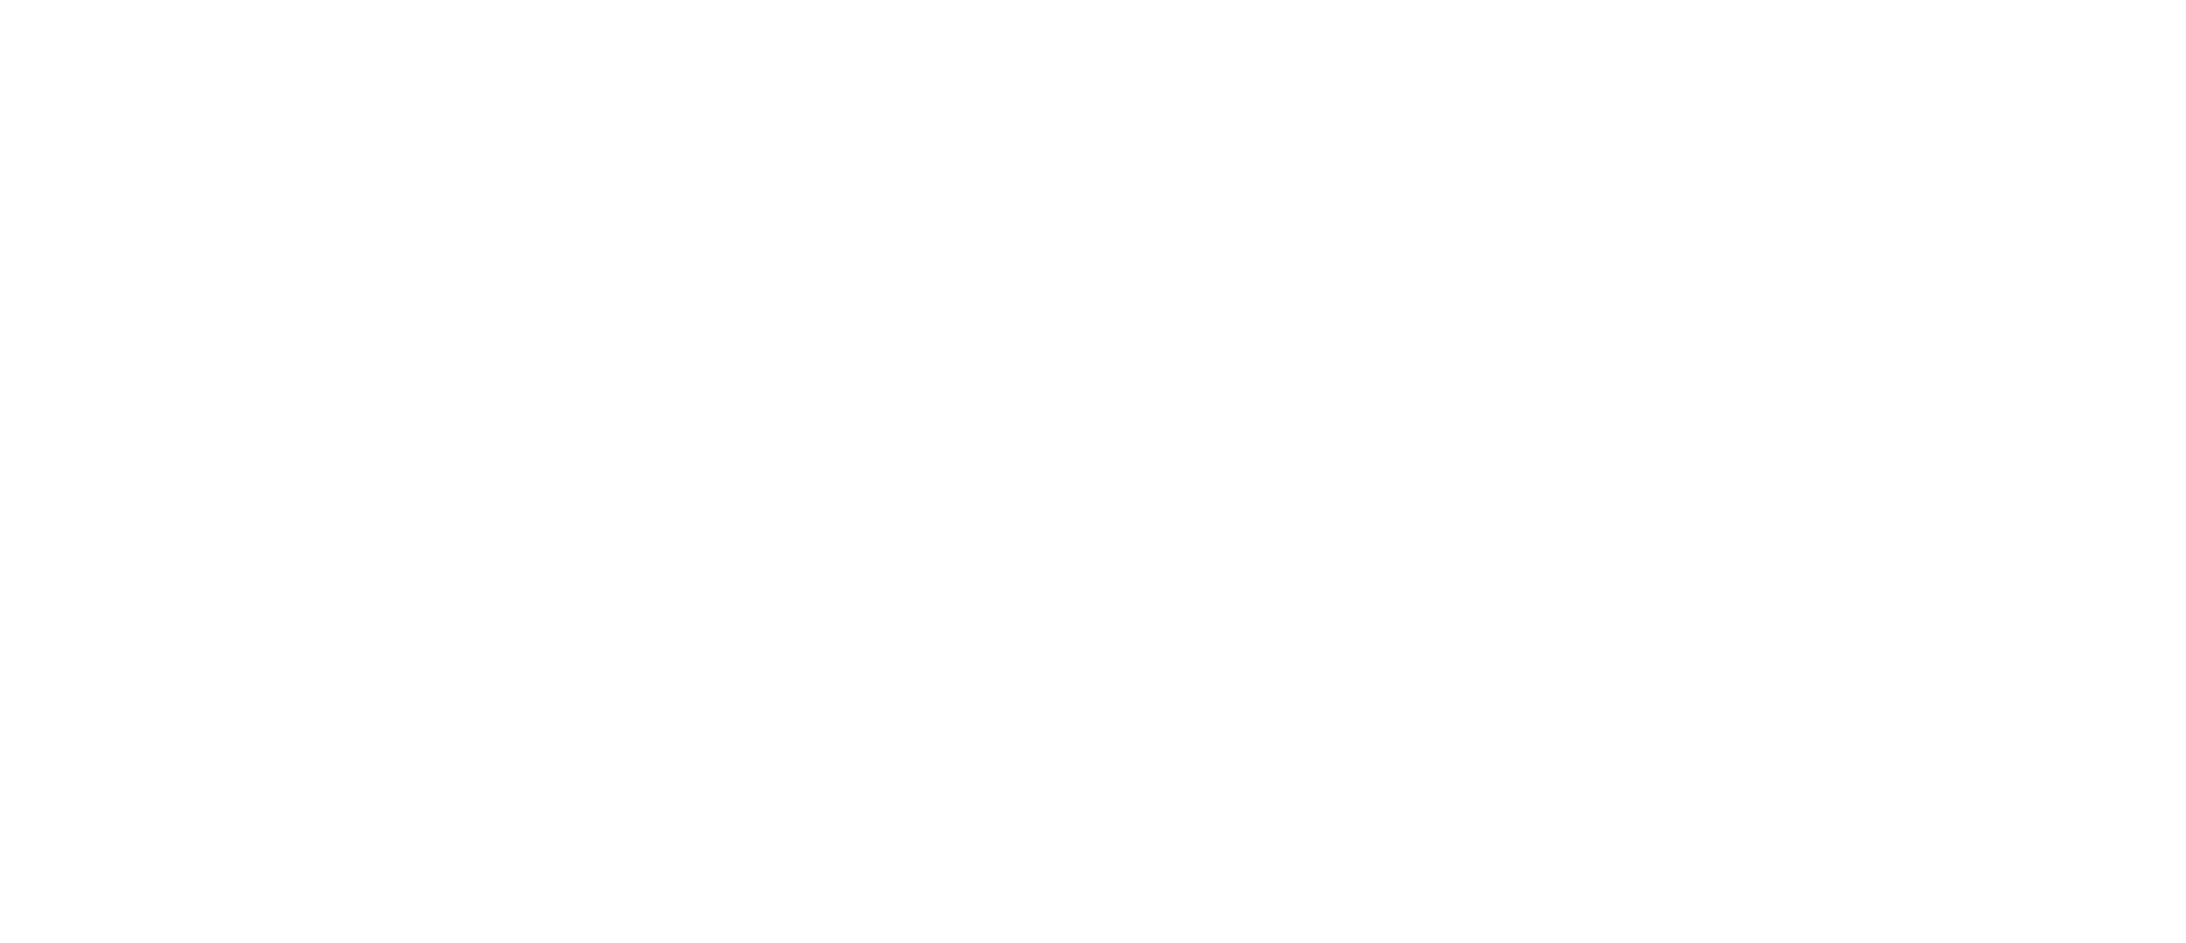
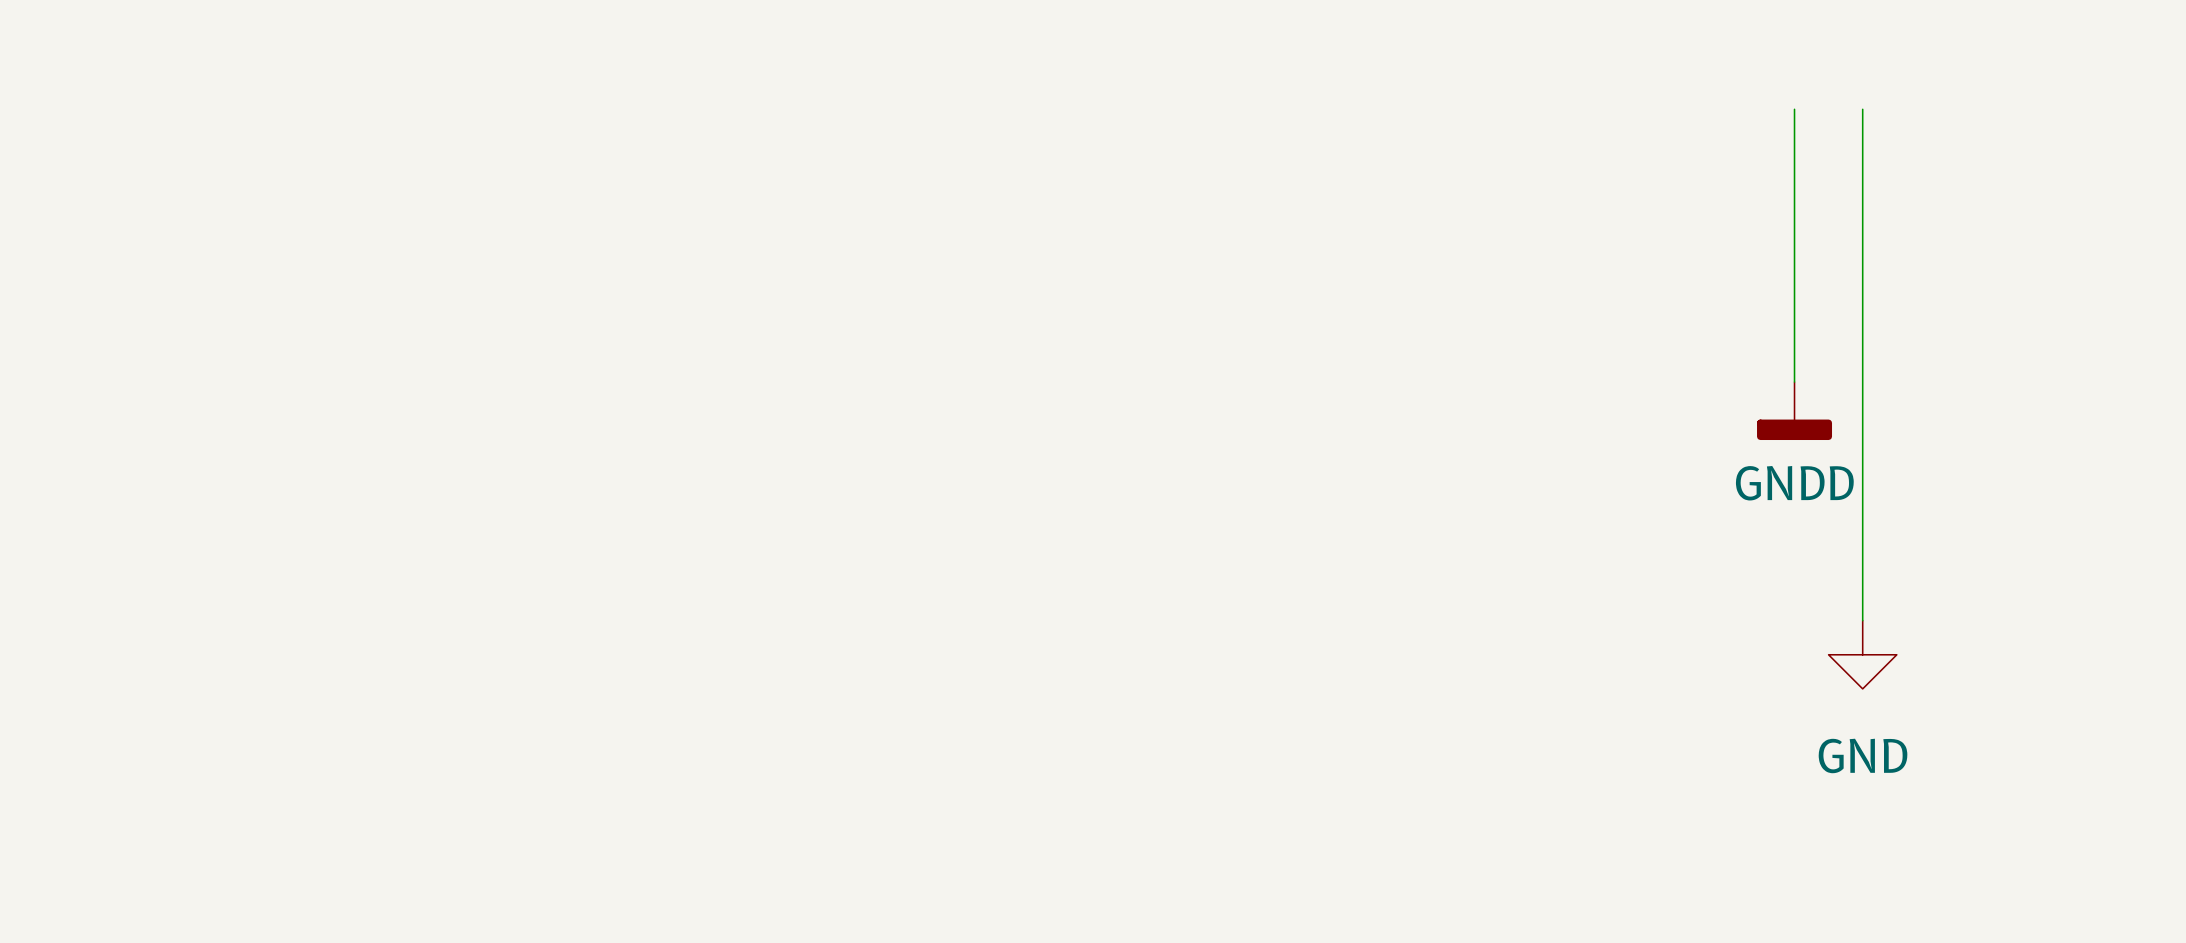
wire: none -> (1794, 109) (1794, 382)
wire: none -> (1862, 109) (1862, 620)
power symbol: none -> GNDD (1794, 411)
power symbol: none -> GND (1862, 654)

